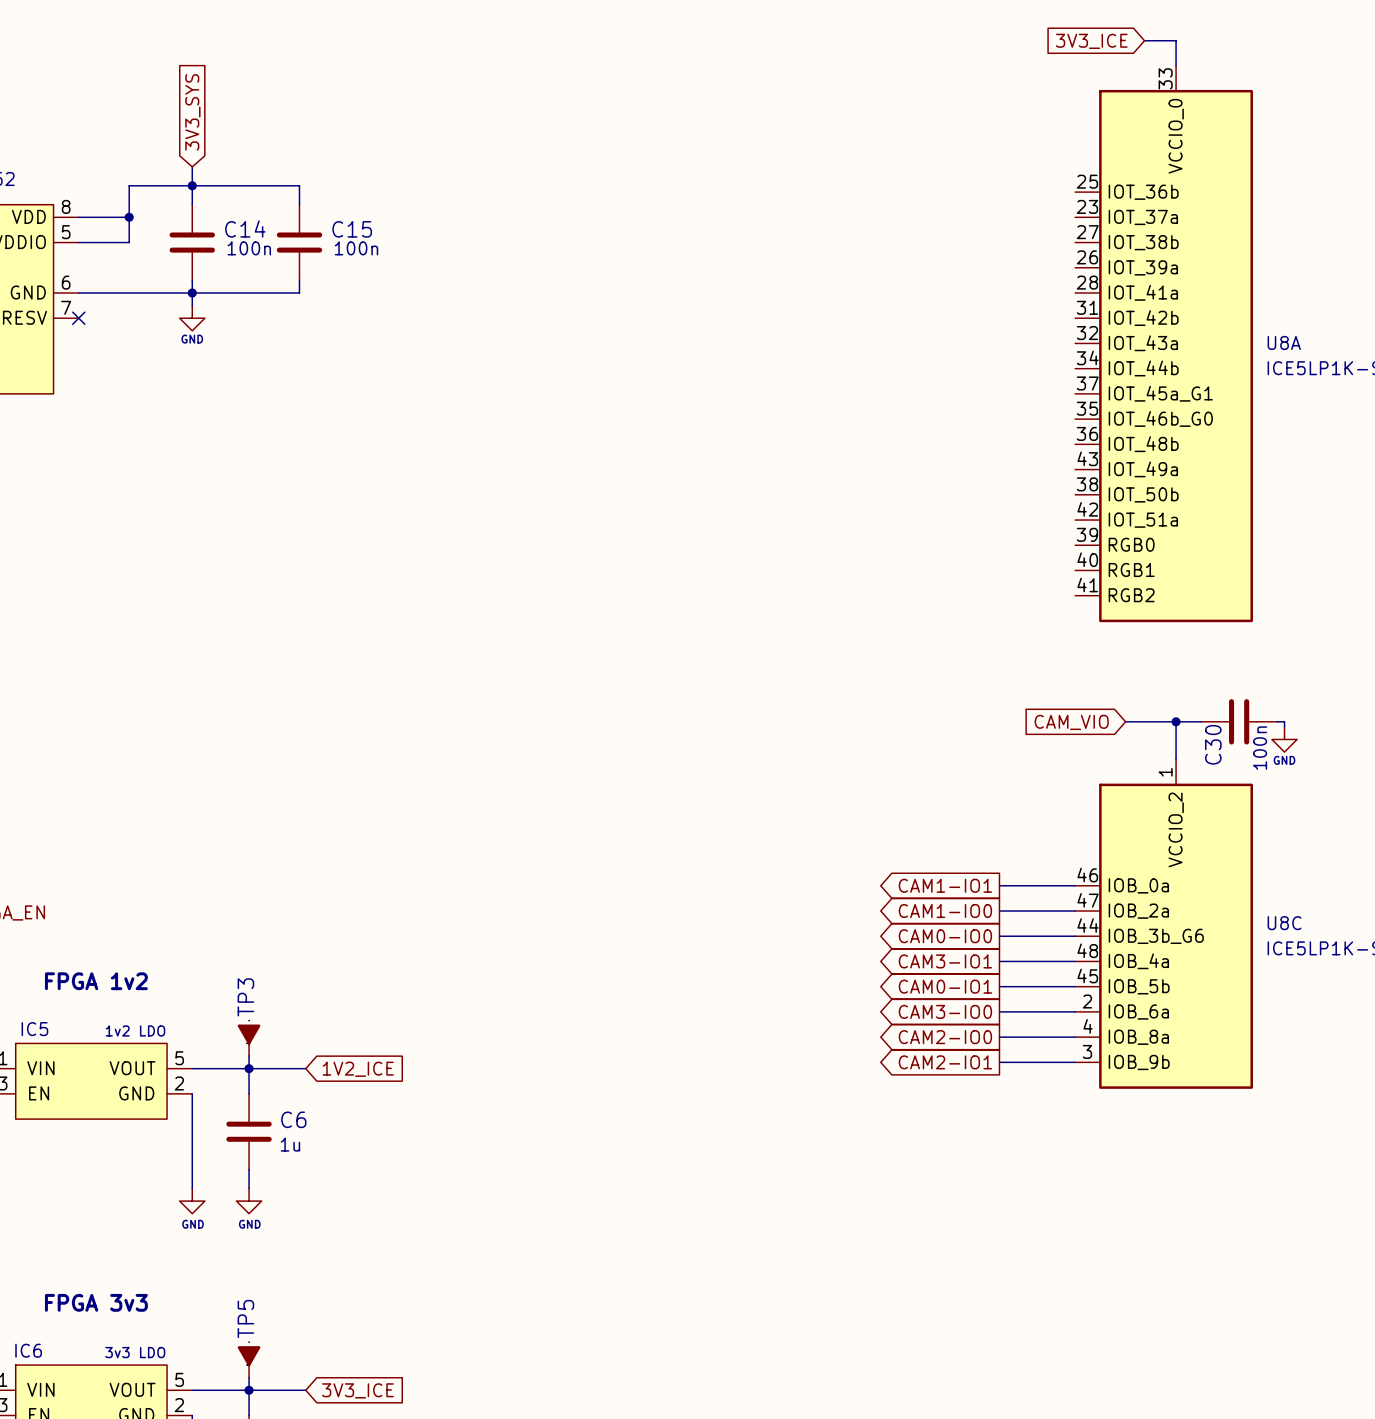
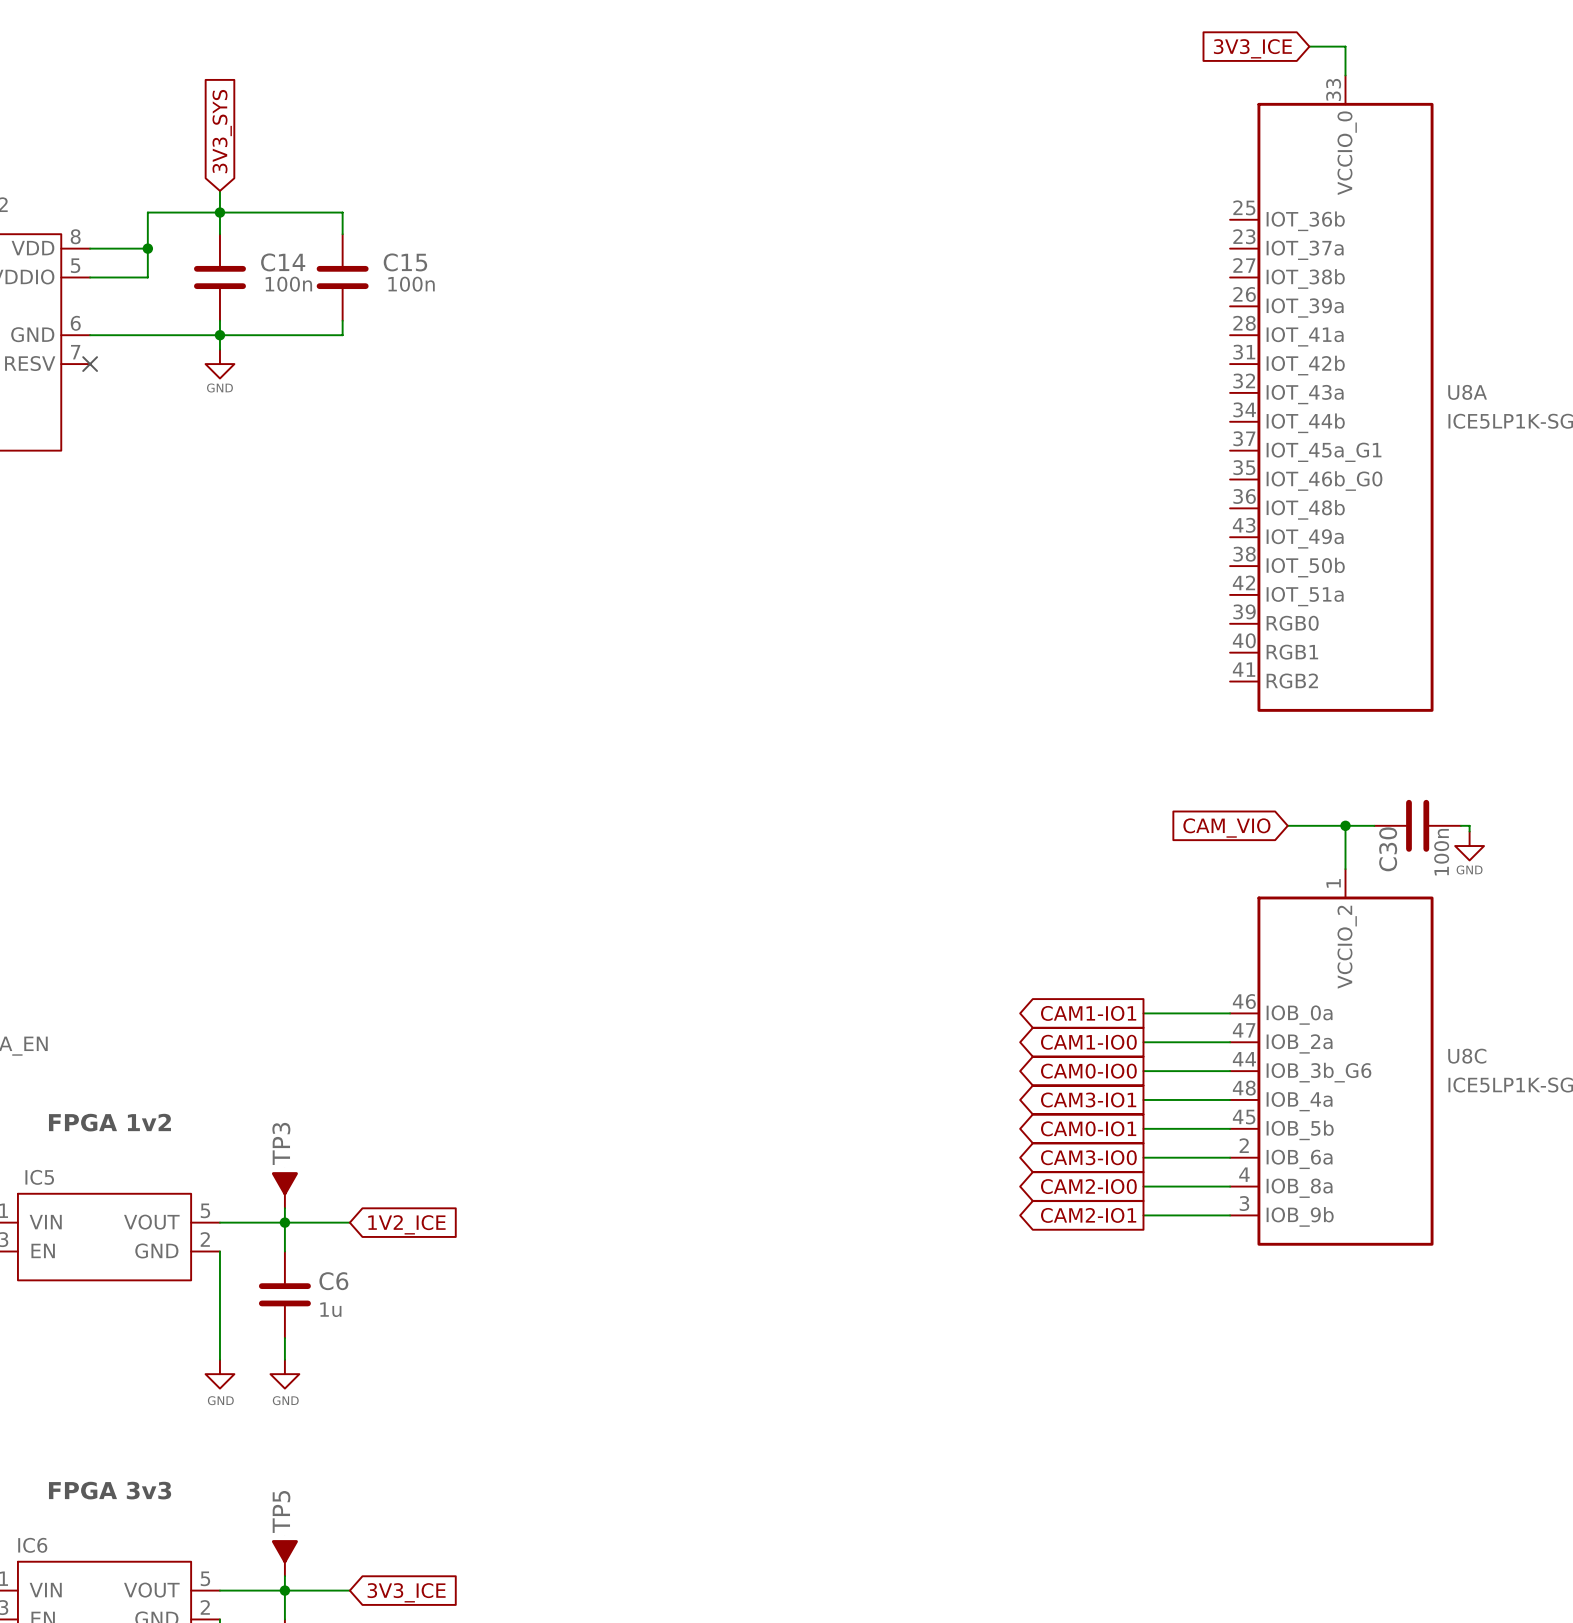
IC5 value: 1v2 LDO (135, 1030) -> none
IC6 value: 3v3 LDO (135, 1352) -> none

